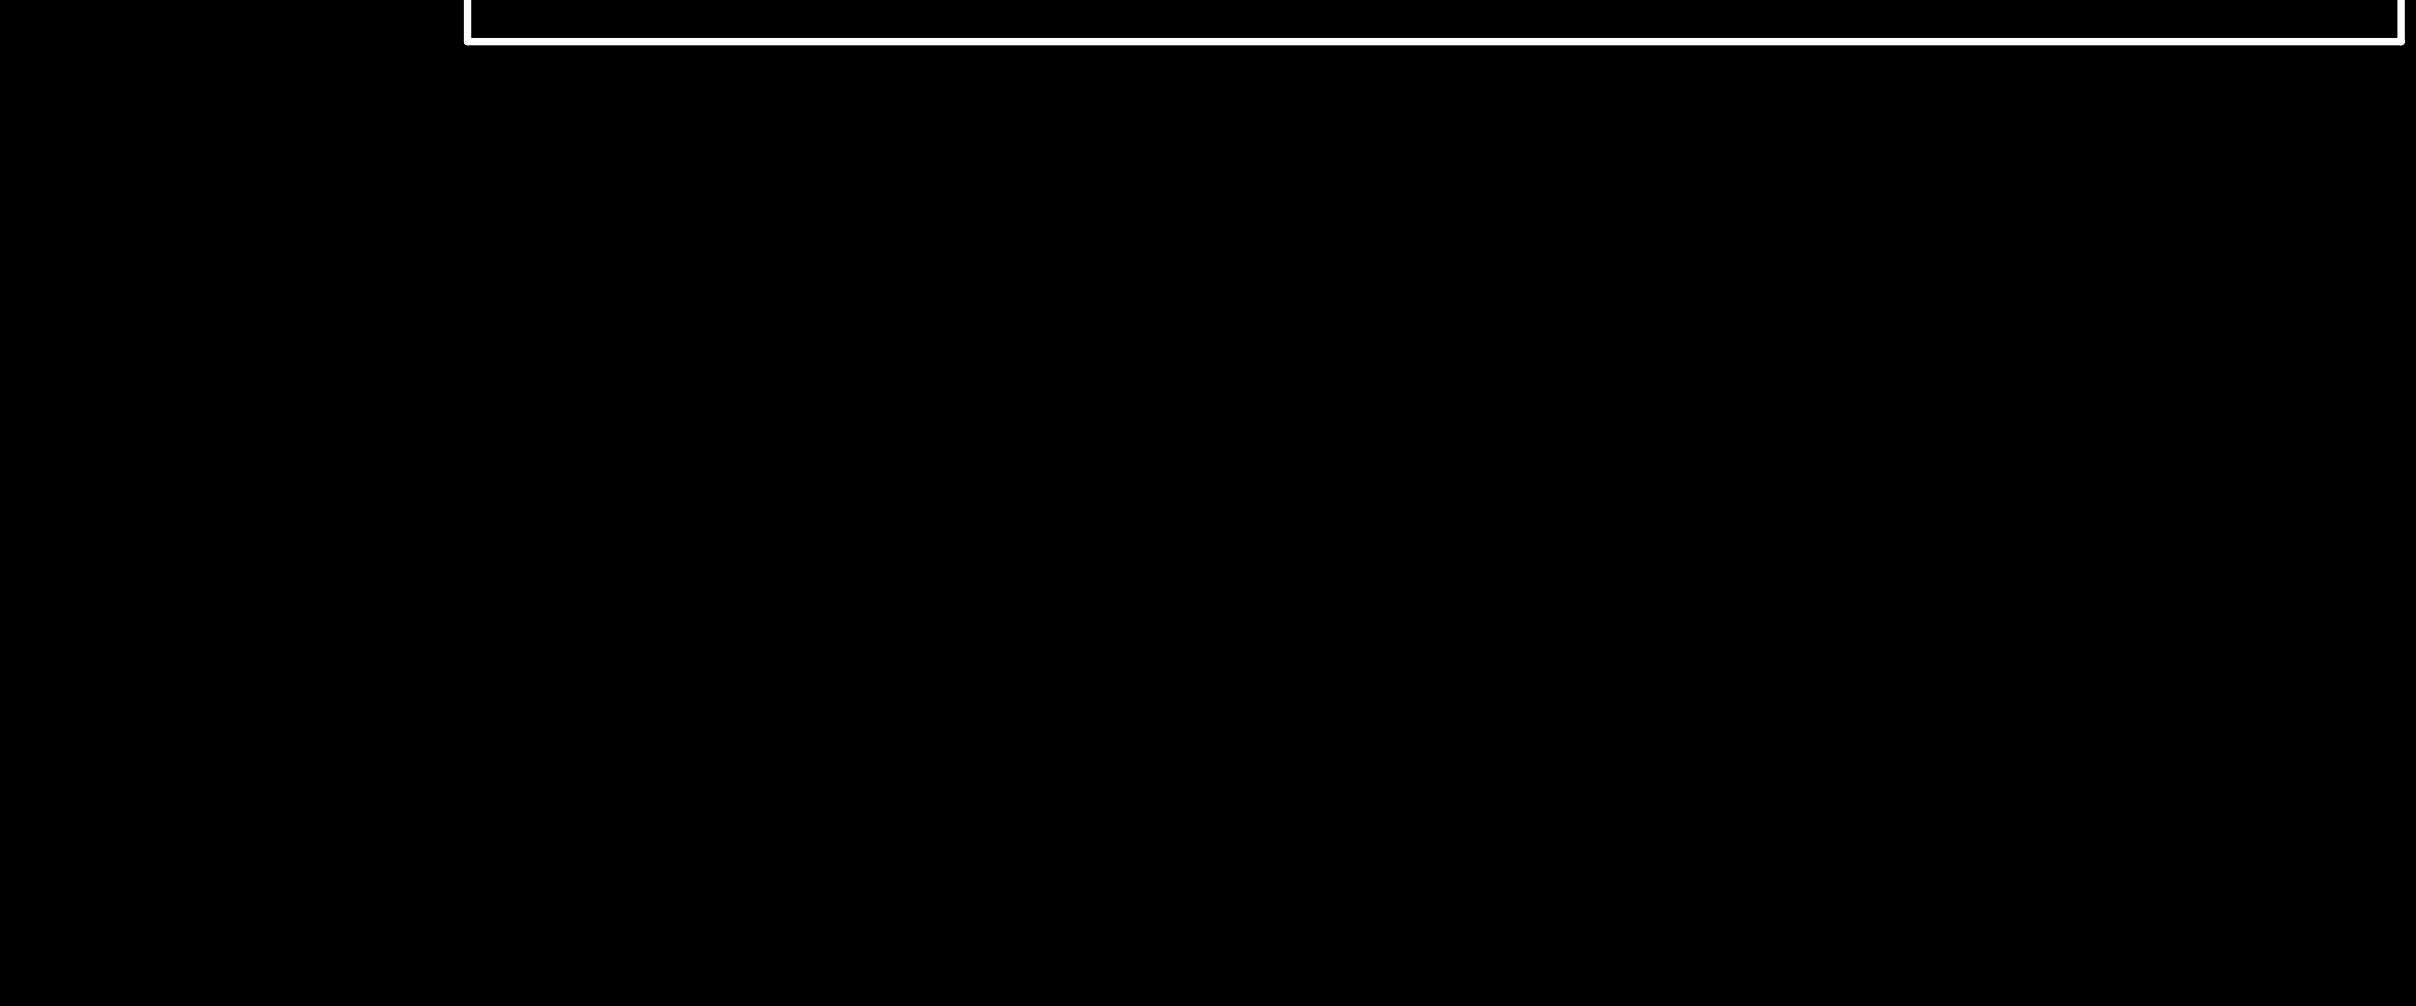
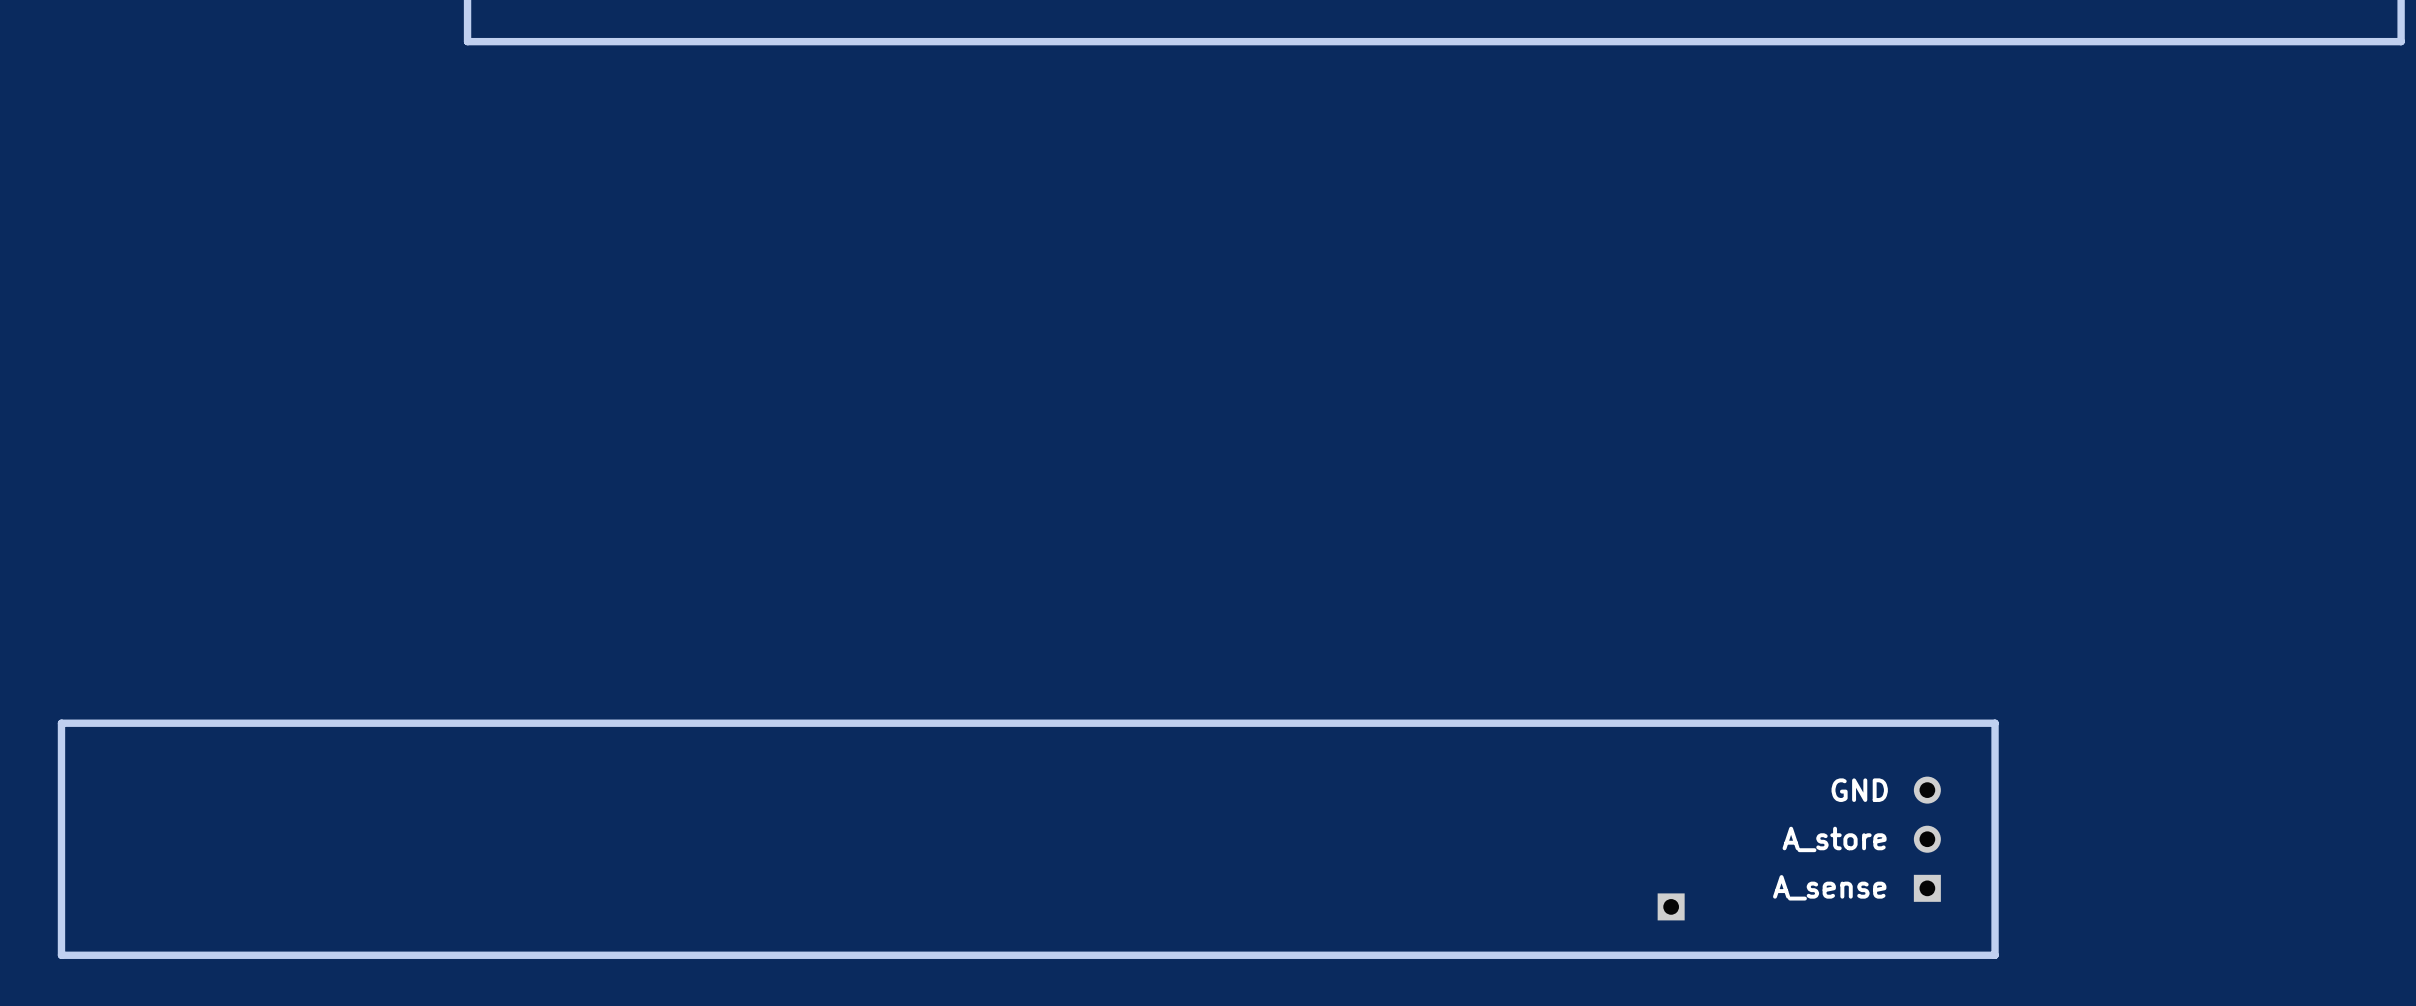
board edge: none -> (1995, 723) (61, 723) (61, 955) (1995, 955) (1995, 723)
text: none -> GND (1859, 790)
part: none -> (1927, 839)
text: none -> A_store (1834, 839)
text: none -> A_sense (1829, 887)
part: none -> (1671, 906)

